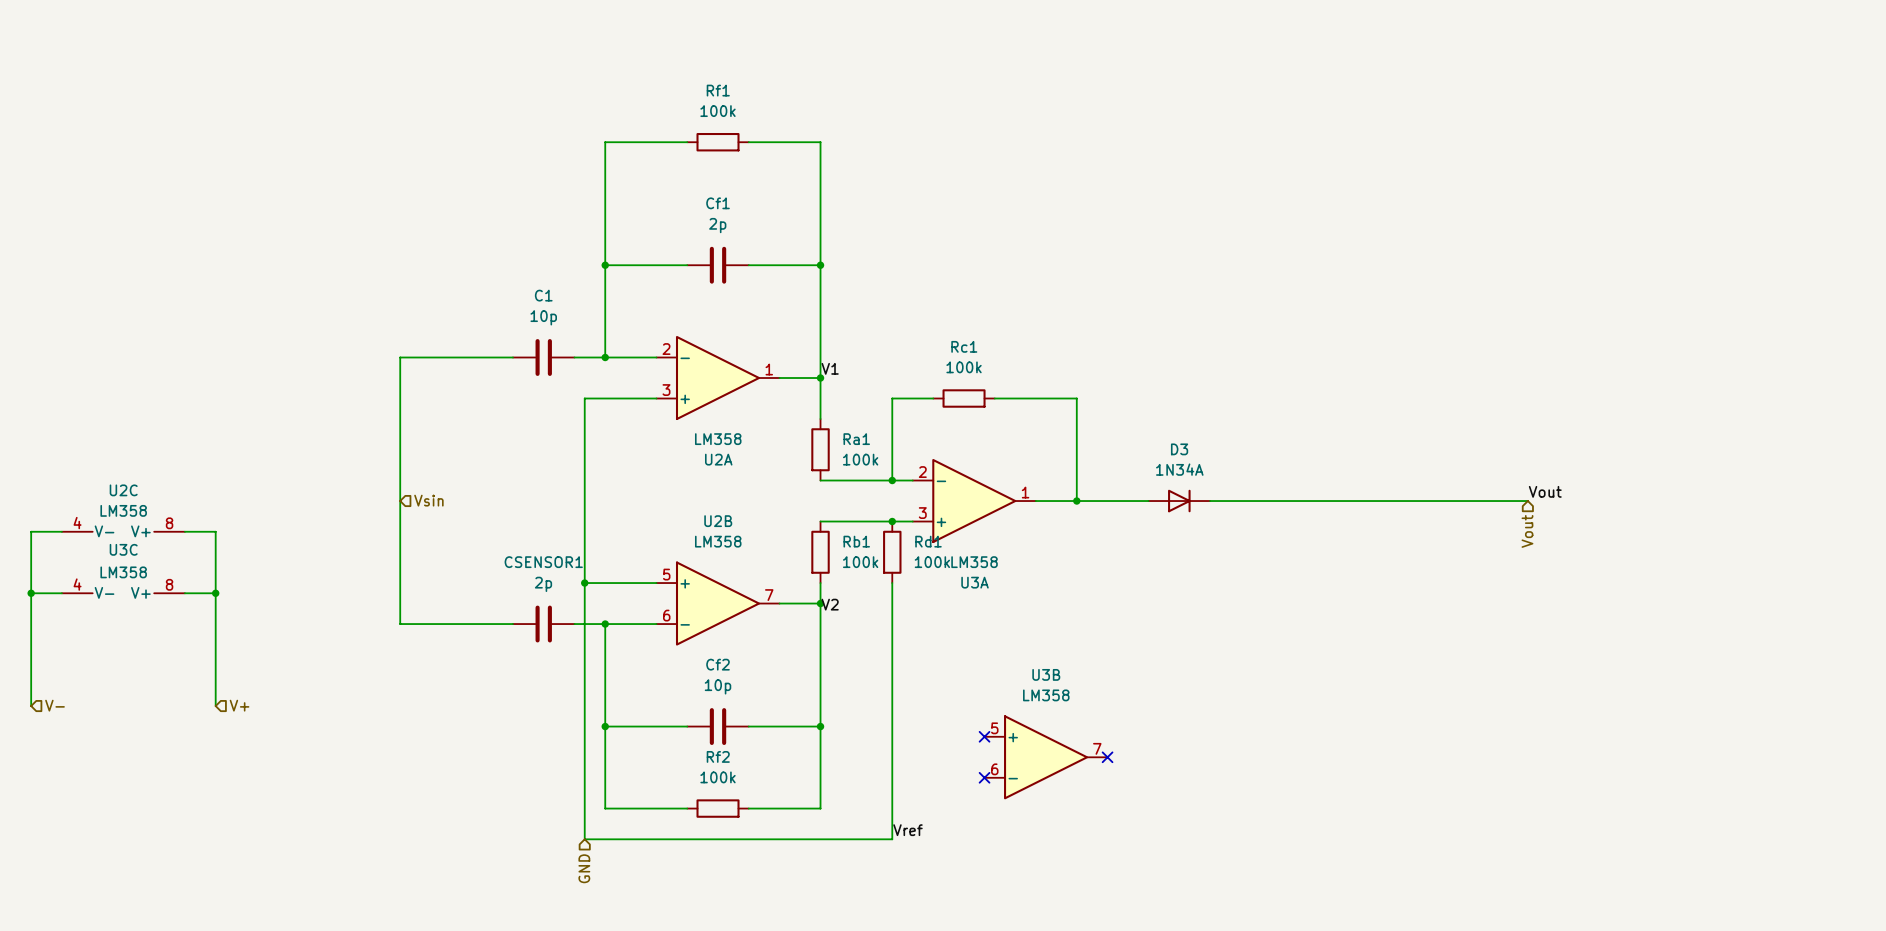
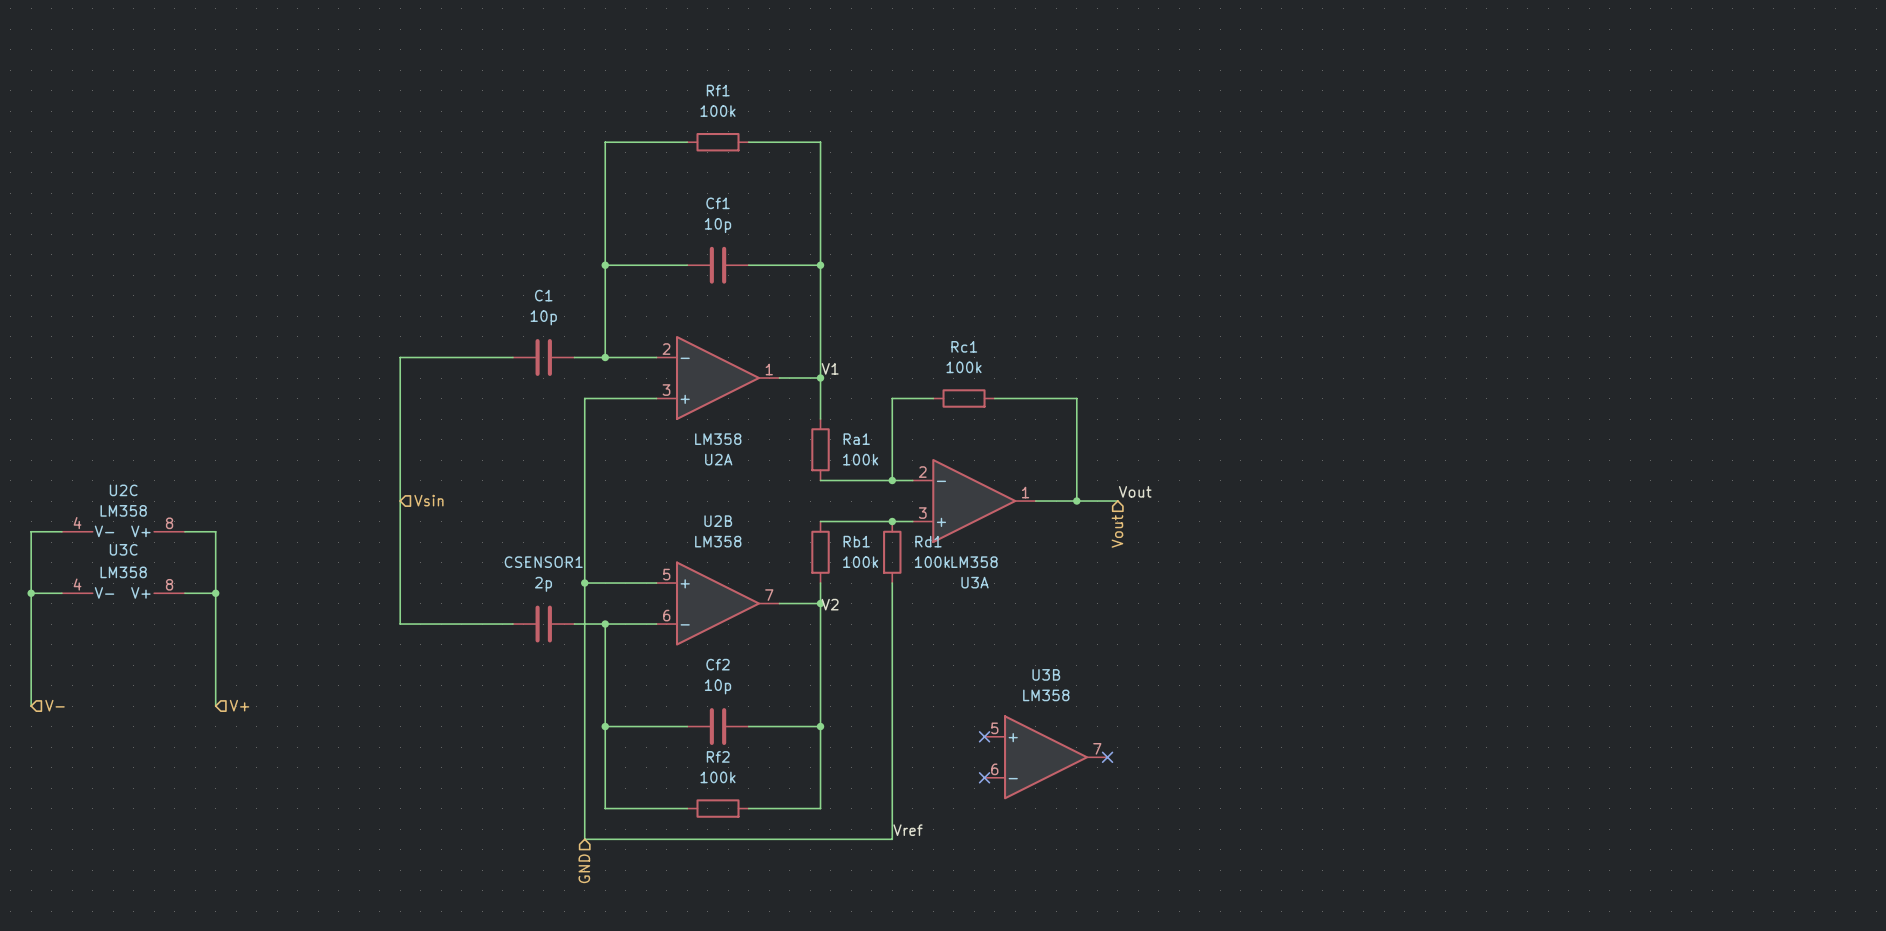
Cf1 value: 2p (717, 225) -> 10p (718, 225)
label: none -> Vout (1135, 491)
label: Vout (1545, 491) -> none
wire: (1117, 501) (1148, 501) -> none
D3: 1N34A (1179, 501) -> none
wire: (1210, 501) (1527, 501) -> none
hierarchical label: none -> Vout (1117, 531)
hierarchical label: Vout (1527, 531) -> none

